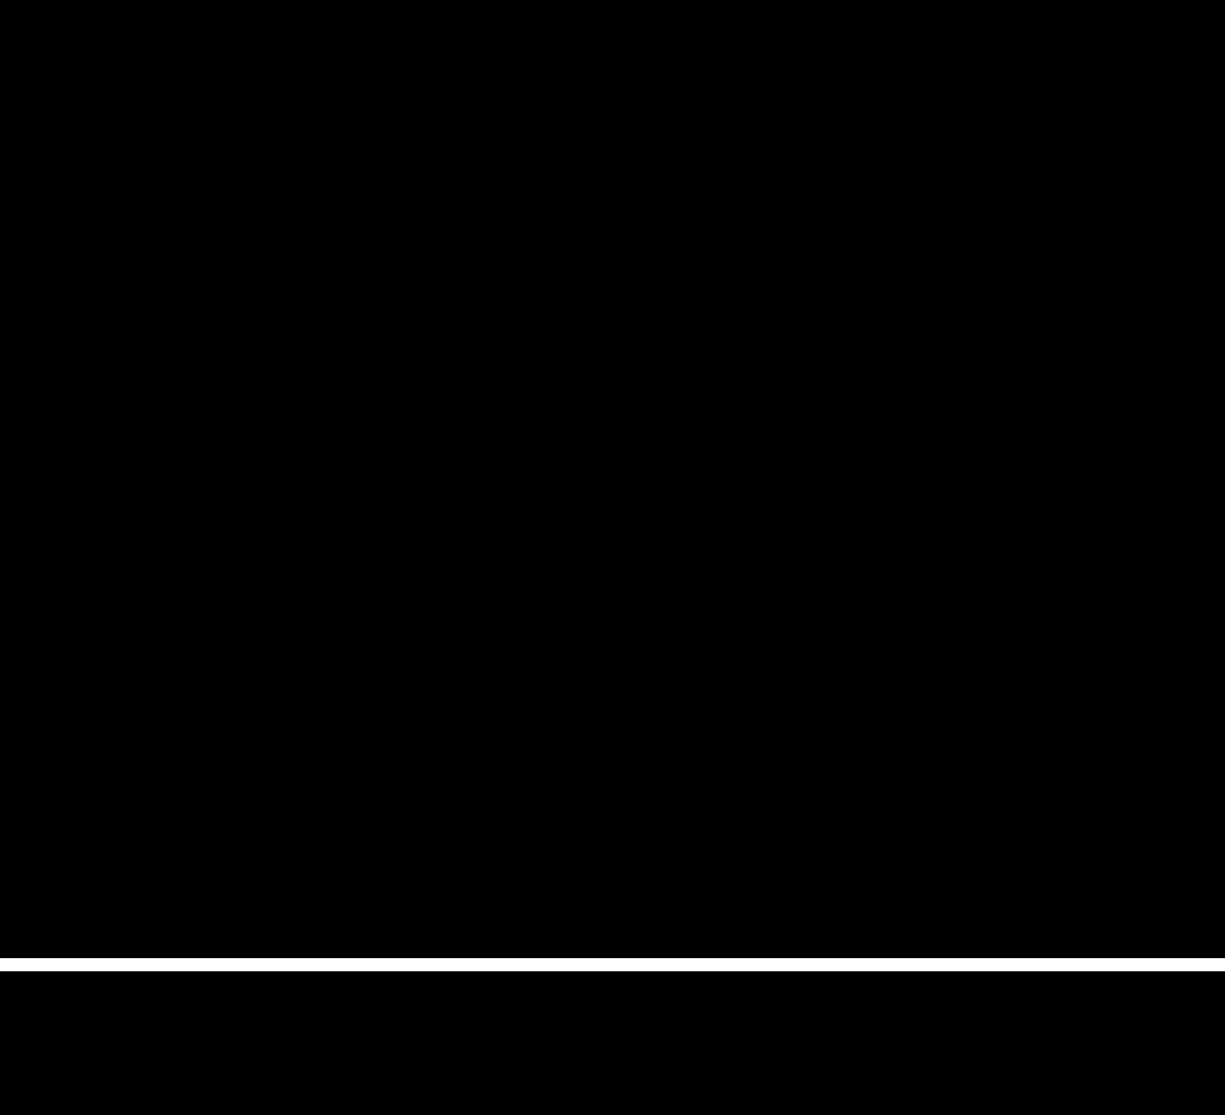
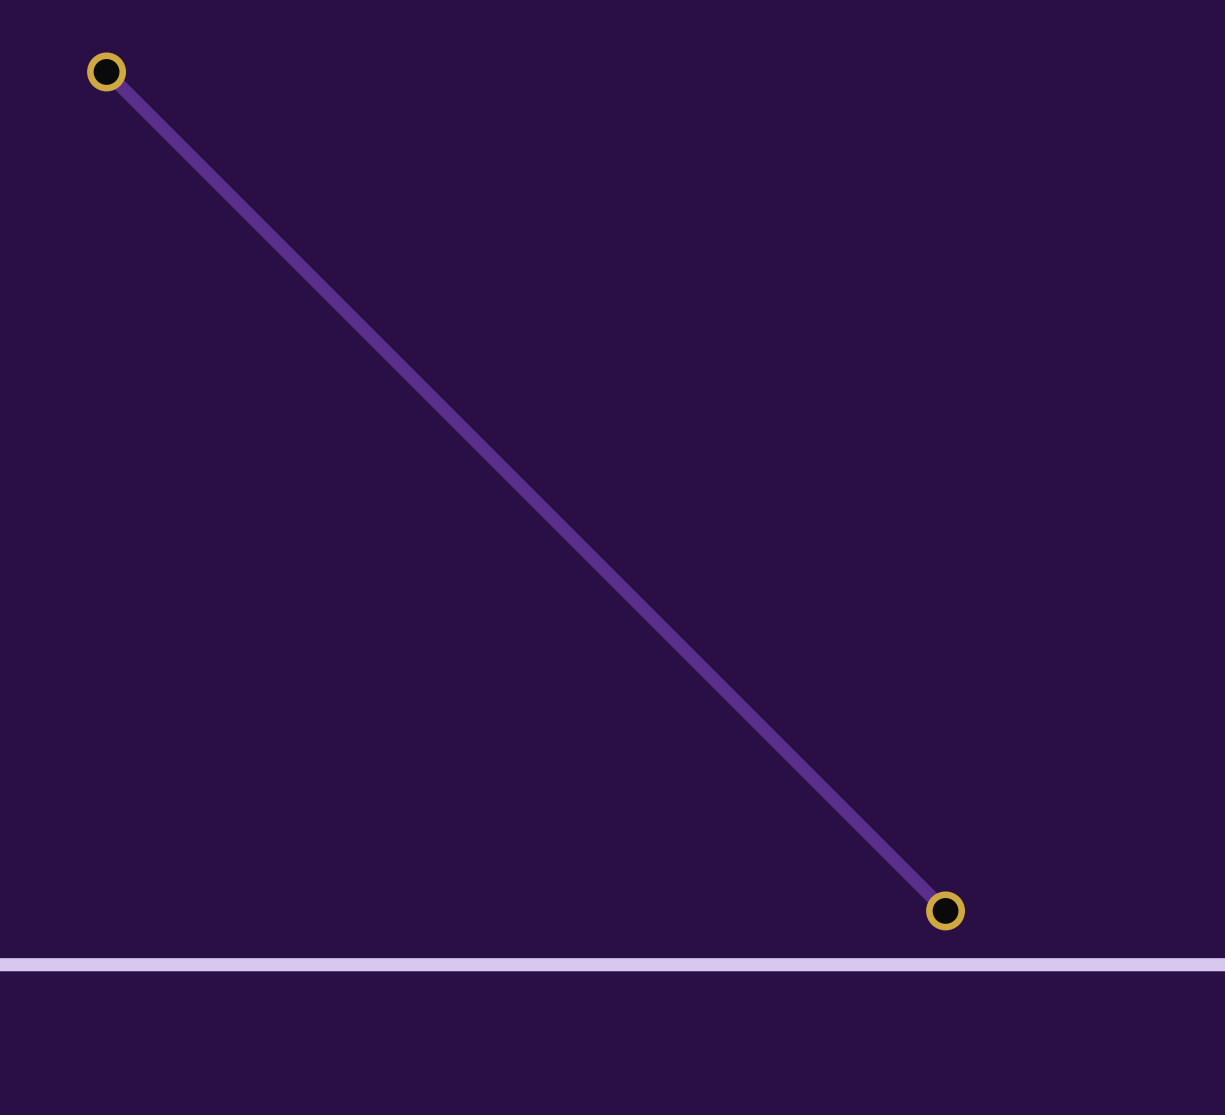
track: none -> (106, 71) (945, 910)
via: none -> (106, 71)
via: none -> (945, 910)

